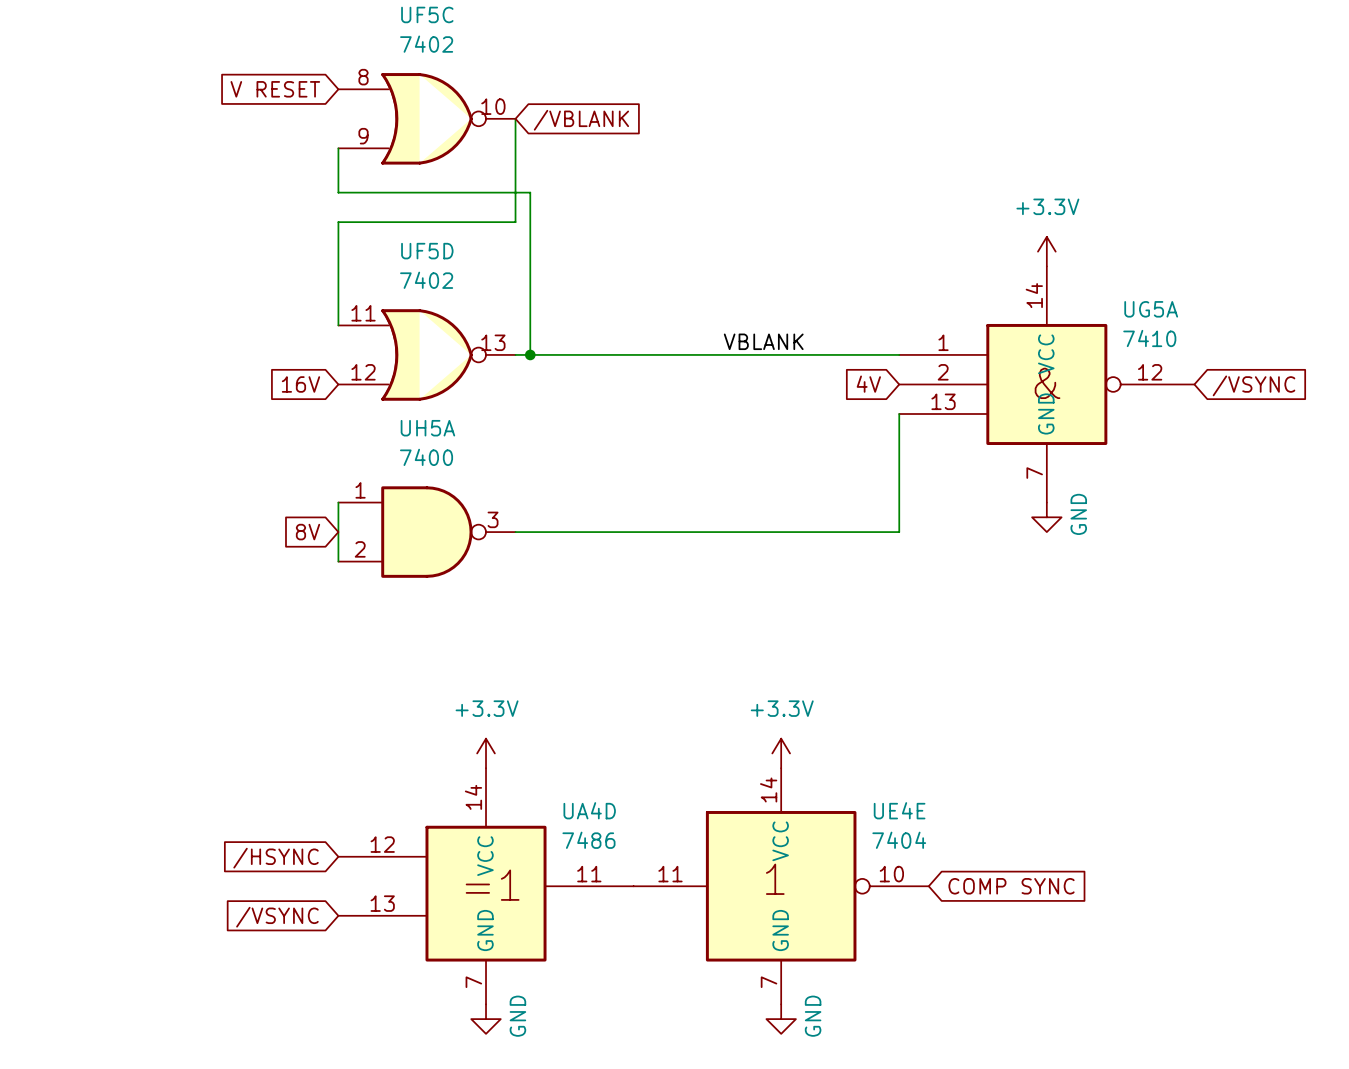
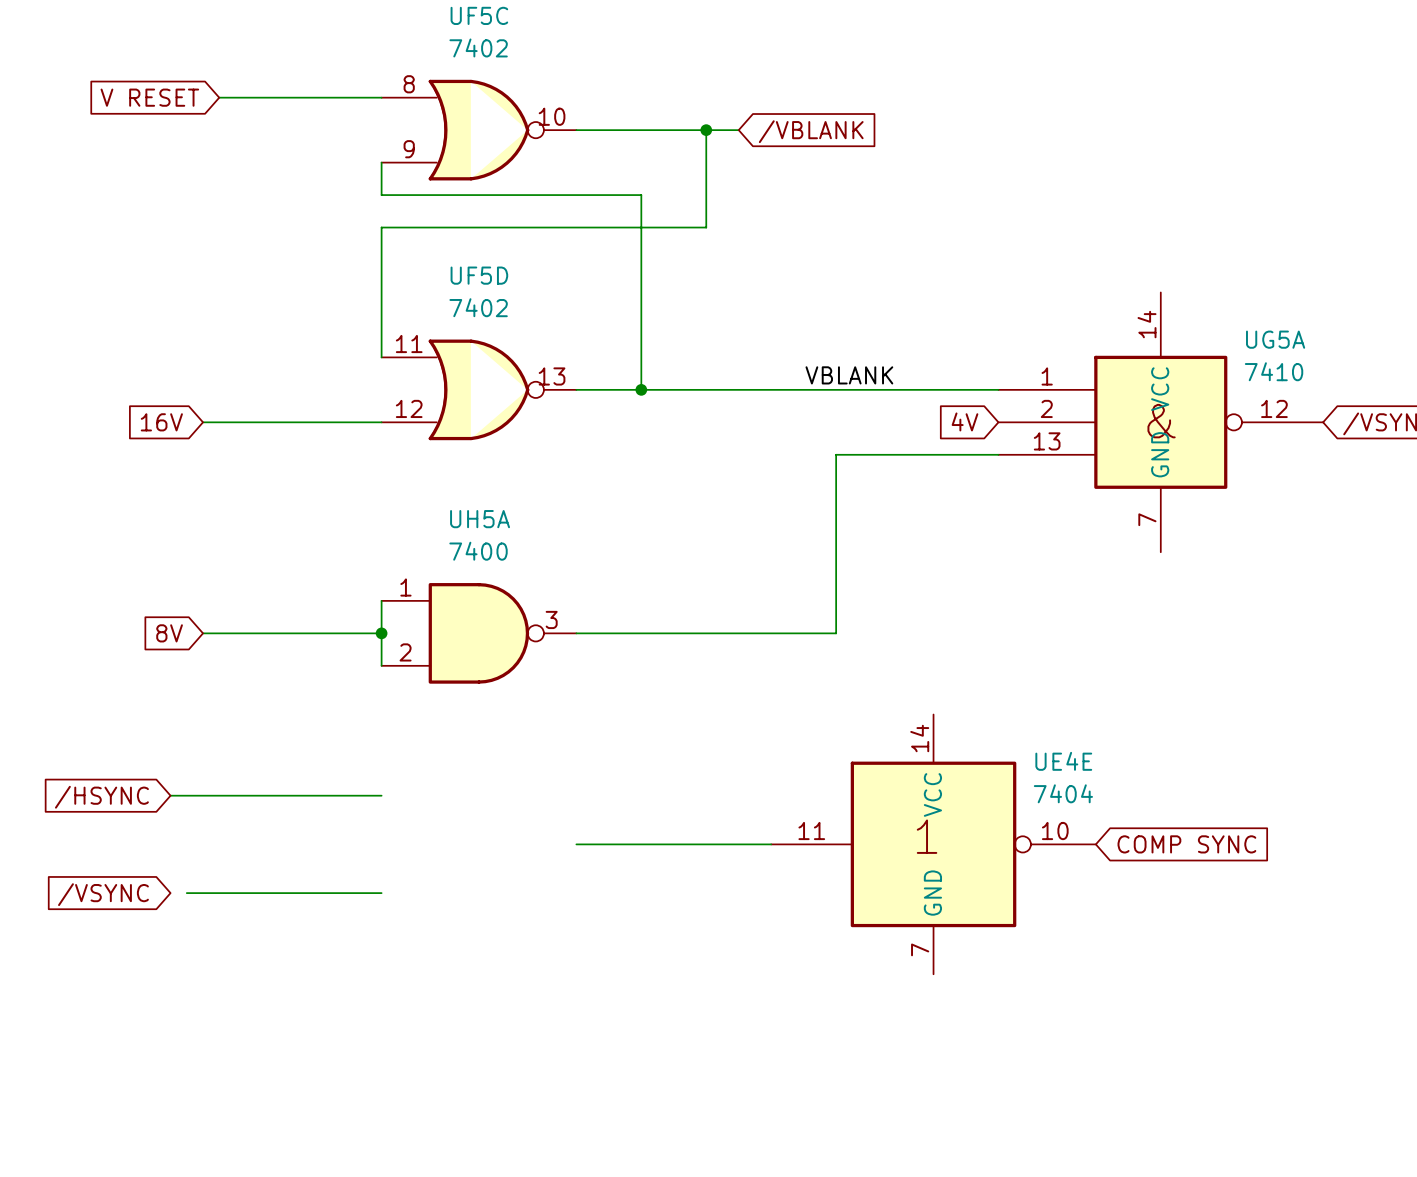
wire: none -> (219, 97) (381, 97)
global label position: V RESET (275, 89) -> V RESET (149, 97)
wire: (515, 118) (515, 222) (338, 222) -> (706, 130) (706, 227) (381, 227) (381, 243)
wire: none -> (576, 130) (738, 130)
junction: none -> (706, 130)
global label position: /VBLANK (581, 120) -> /VBLANK (811, 131)
wire: (338, 177) (338, 192) (530, 192) (530, 354) -> (381, 195) (641, 195) (641, 389)
power symbol: +3.3V (1046, 251) -> none
junction position: (530, 354) -> (641, 389)
wire: none -> (203, 422) (381, 422)
global label position: 16V (300, 384) -> 16V (161, 422)
wire: (899, 414) (899, 532) (515, 532) -> (998, 454) (836, 454) (836, 633) (576, 633)
wire: (338, 502) (338, 546) -> (381, 617) (381, 665)
power symbol: GND (1046, 517) -> none
global label position: 8V (308, 532) -> 8V (169, 633)
UH5A position: (426, 532) -> (478, 633)
wire: none -> (203, 633) (381, 633)
junction: none -> (381, 633)
wire: none -> (170, 795) (381, 795)
power symbol: +3.3V (486, 753) -> none
power symbol: +3.3V (781, 753) -> none
wire: none -> (576, 844) (771, 844)
wire: none -> (186, 893) (381, 893)
global label position: /HSYNC (276, 858) -> /HSYNC (101, 797)
UA4D: 7486 (486, 886) -> none
UE4E position: (781, 886) -> (933, 844)
global label position: COMP SYNC (1011, 886) -> COMP SYNC (1186, 844)
global label position: /VSYNC (277, 917) -> /VSYNC (103, 894)
power symbol: GND (486, 1019) -> none
power symbol: GND (781, 1019) -> none

